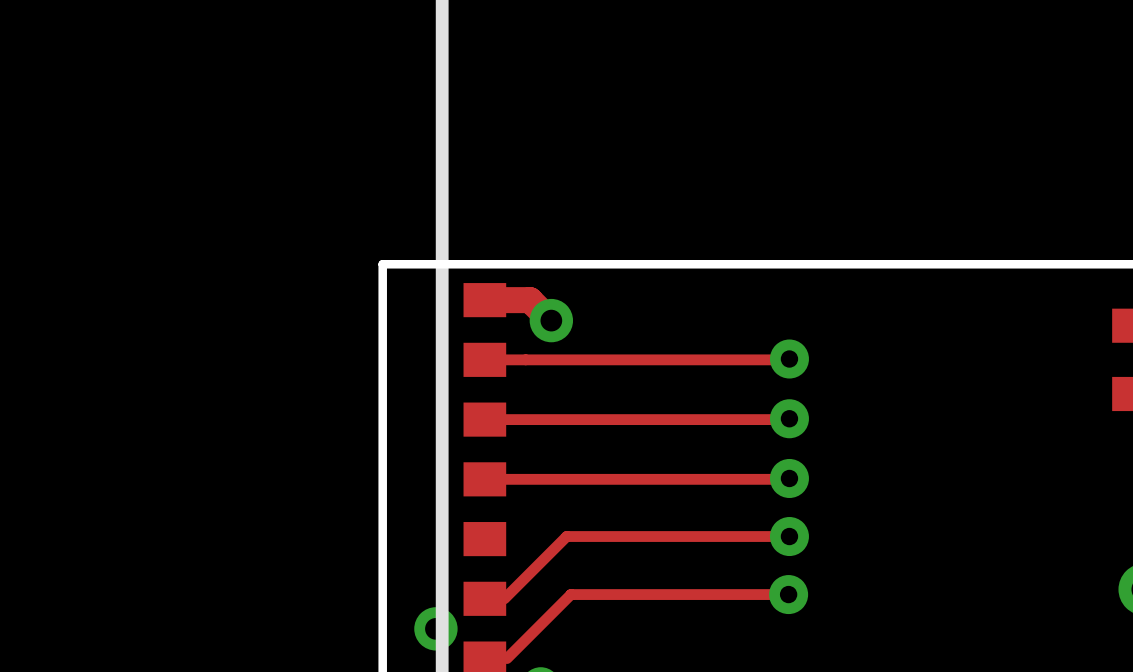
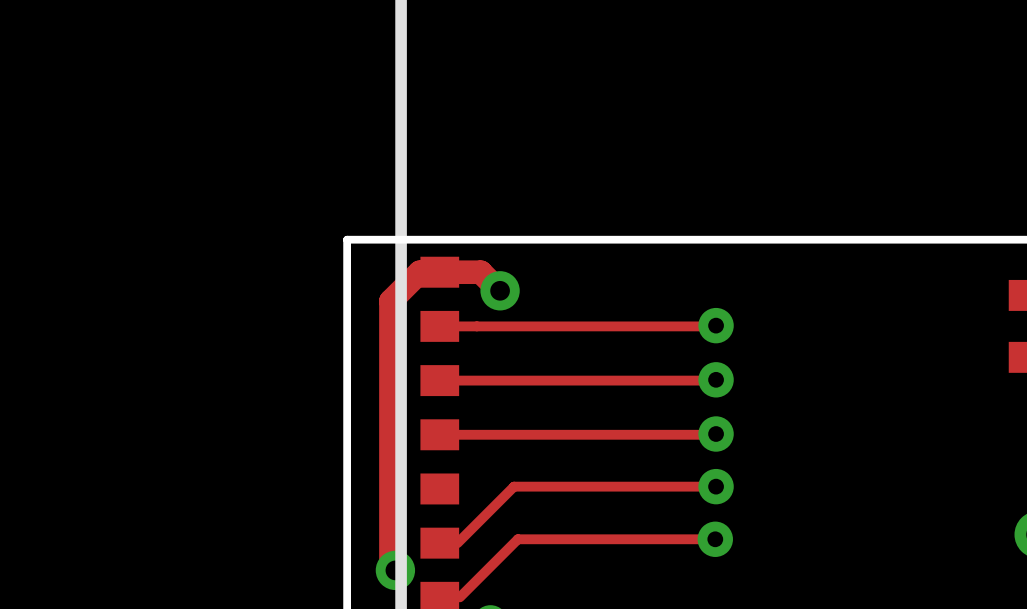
track: none -> (439, 272) (419, 272) (390, 301) (390, 570)

